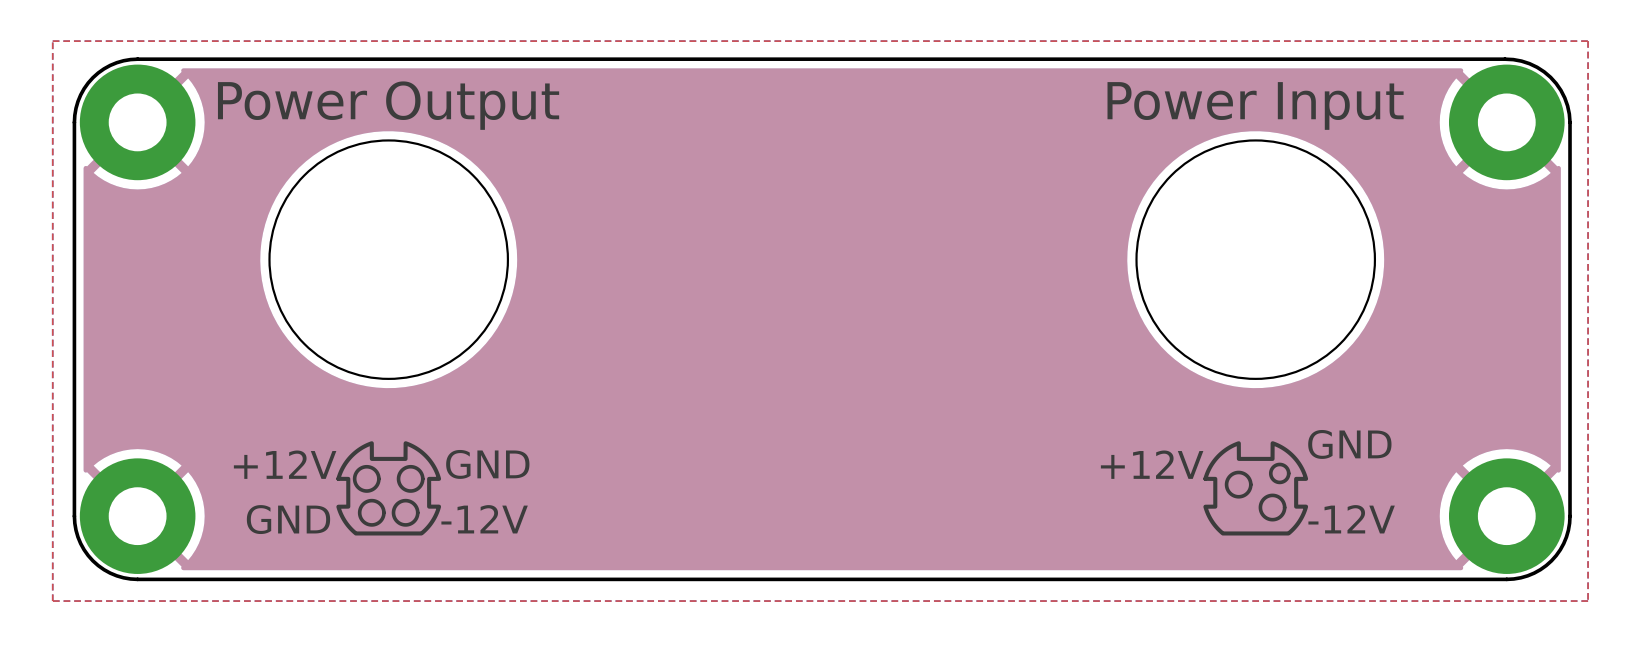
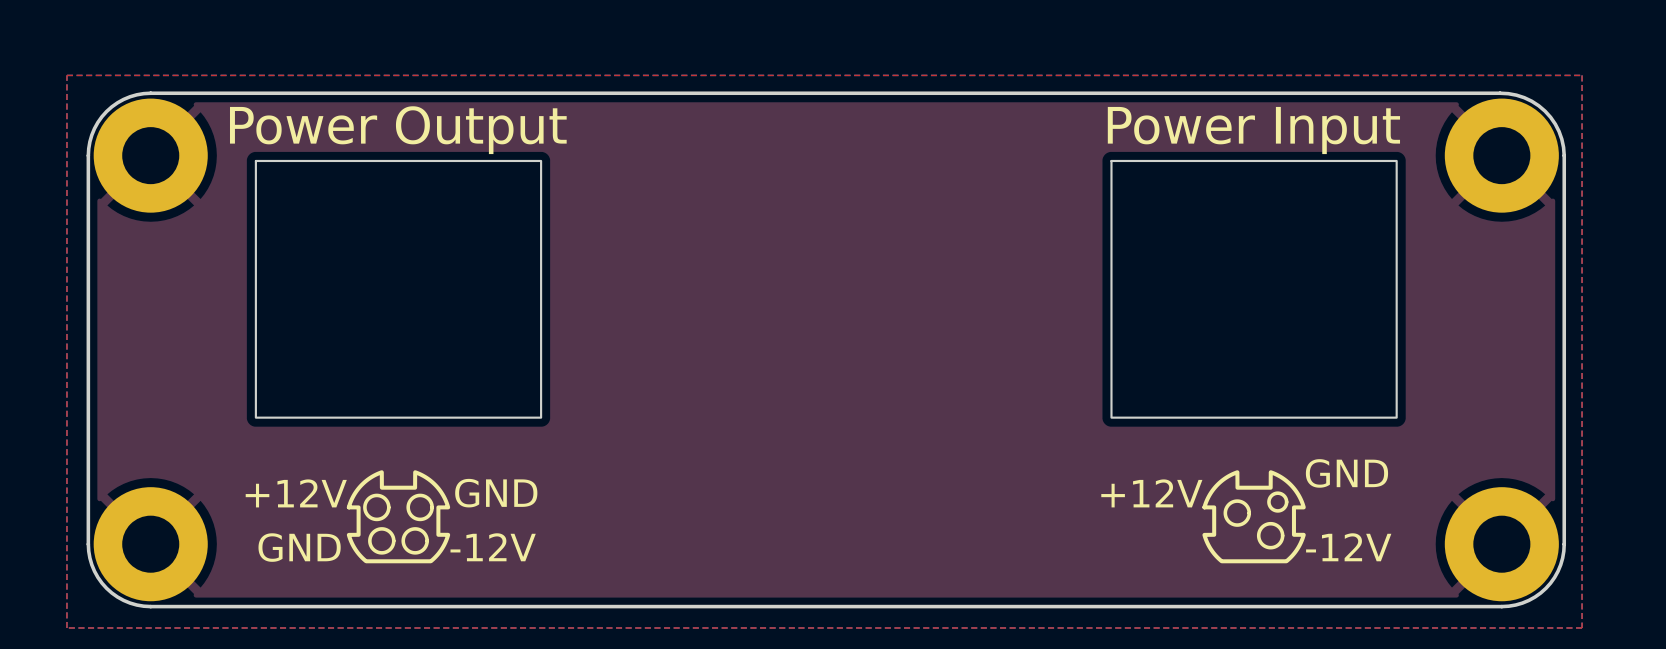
drawing shape: [217, 81, 560, 536] -> [229, 106, 567, 564]
drawing shape: [1100, 82, 1404, 536] -> [1101, 106, 1401, 564]
drawing shape: [268, 139, 510, 380] -> [254, 159, 543, 419]
drawing shape: [1135, 139, 1377, 380] -> [1110, 159, 1398, 419]

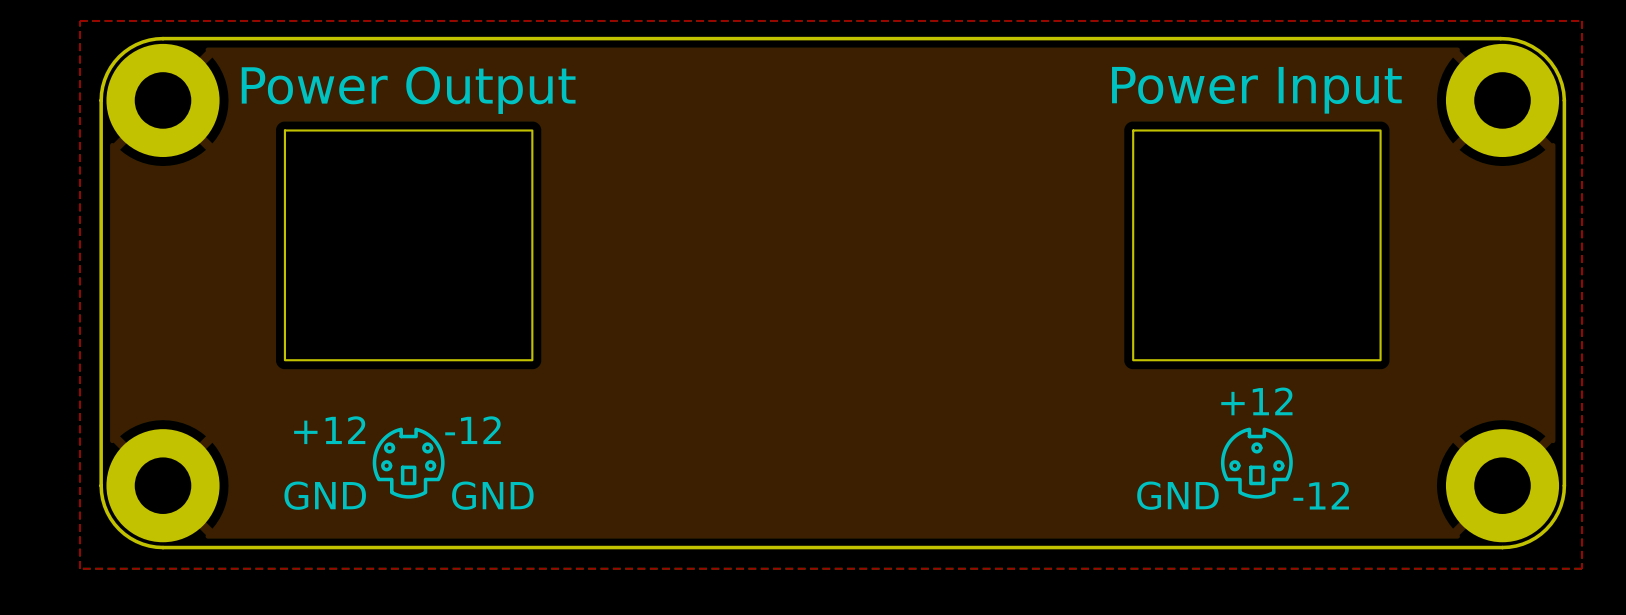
drawing shape: [229, 106, 567, 564] -> [241, 66, 576, 510]
drawing shape: [1101, 106, 1401, 564] -> [1112, 66, 1402, 510]
drawing shape: [254, 159, 543, 419] -> [283, 129, 534, 362]
drawing shape: [1110, 159, 1398, 419] -> [1132, 129, 1382, 362]

